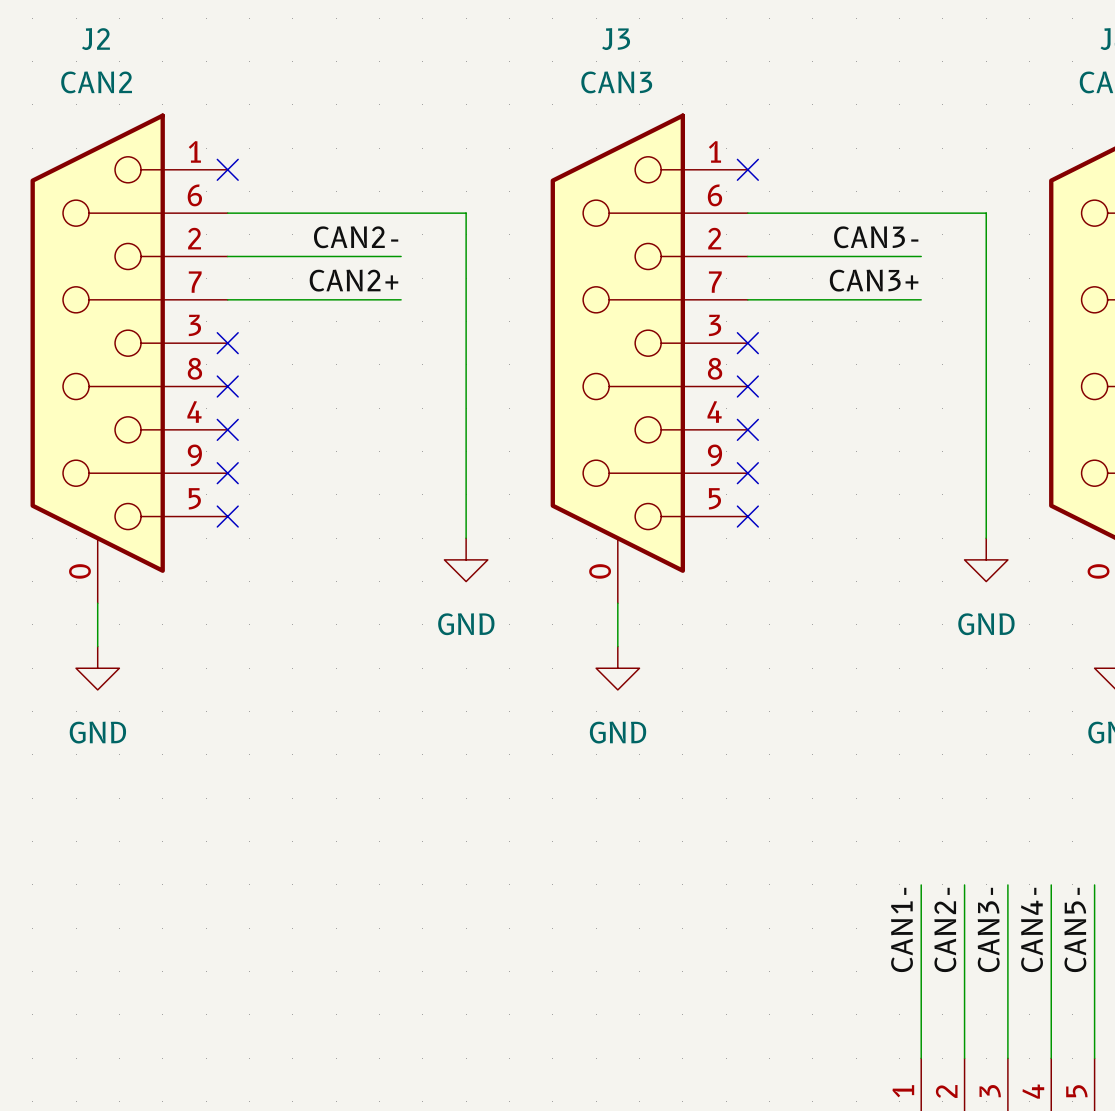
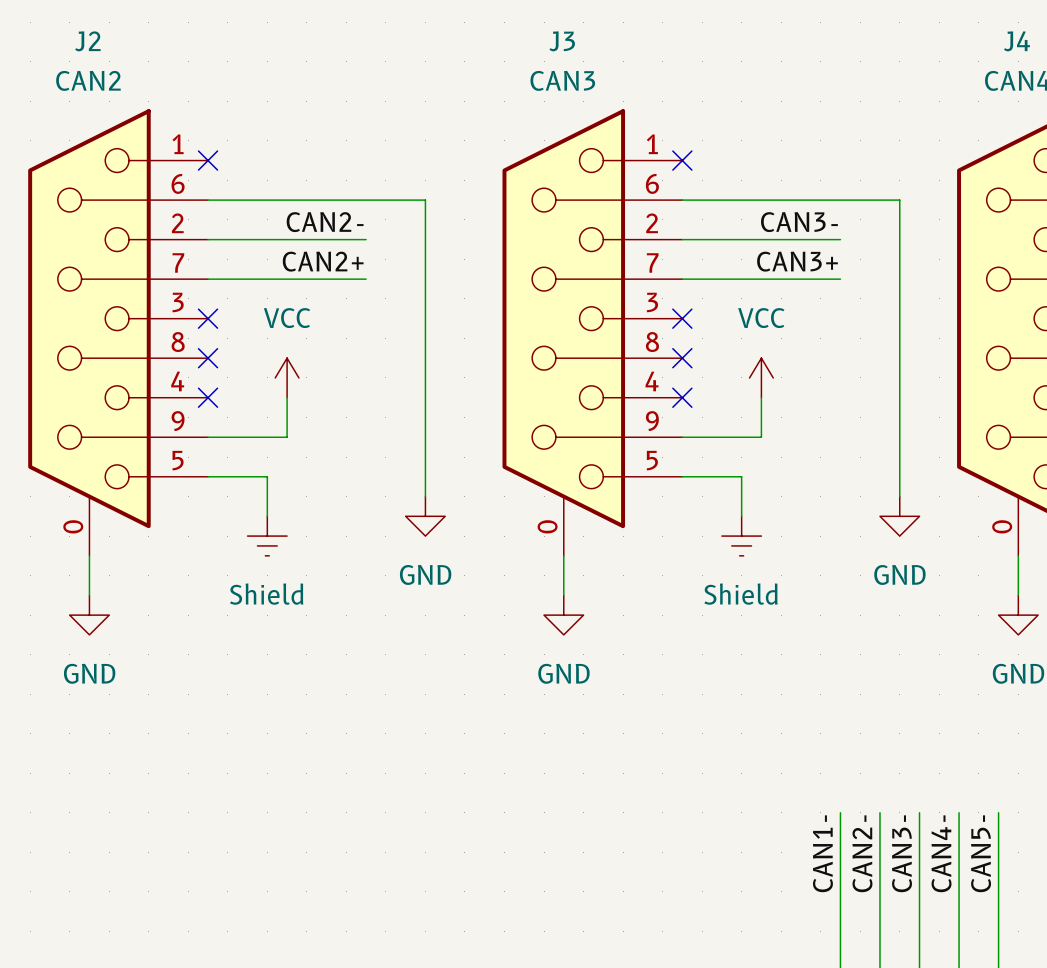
power symbol: none -> VCC (287, 377)
power symbol: none -> VCC (761, 377)
wire: none -> (287, 397) (287, 437) (208, 437)
wire: none -> (761, 397) (761, 437) (682, 437)
no-connect mark: (227, 473) -> none
no-connect mark: (747, 473) -> none
wire: none -> (208, 476) (267, 476) (267, 516)
no-connect mark: (227, 516) -> none
wire: none -> (682, 476) (741, 476) (741, 516)
no-connect mark: (747, 516) -> none
power symbol: none -> Shield (267, 536)
power symbol: none -> Shield (741, 536)

